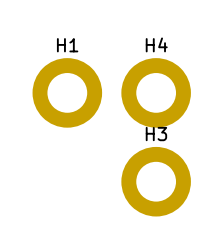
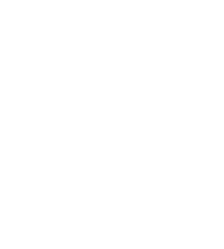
H1: (67, 92) -> none
H4: (156, 92) -> none
H3: (156, 181) -> none

